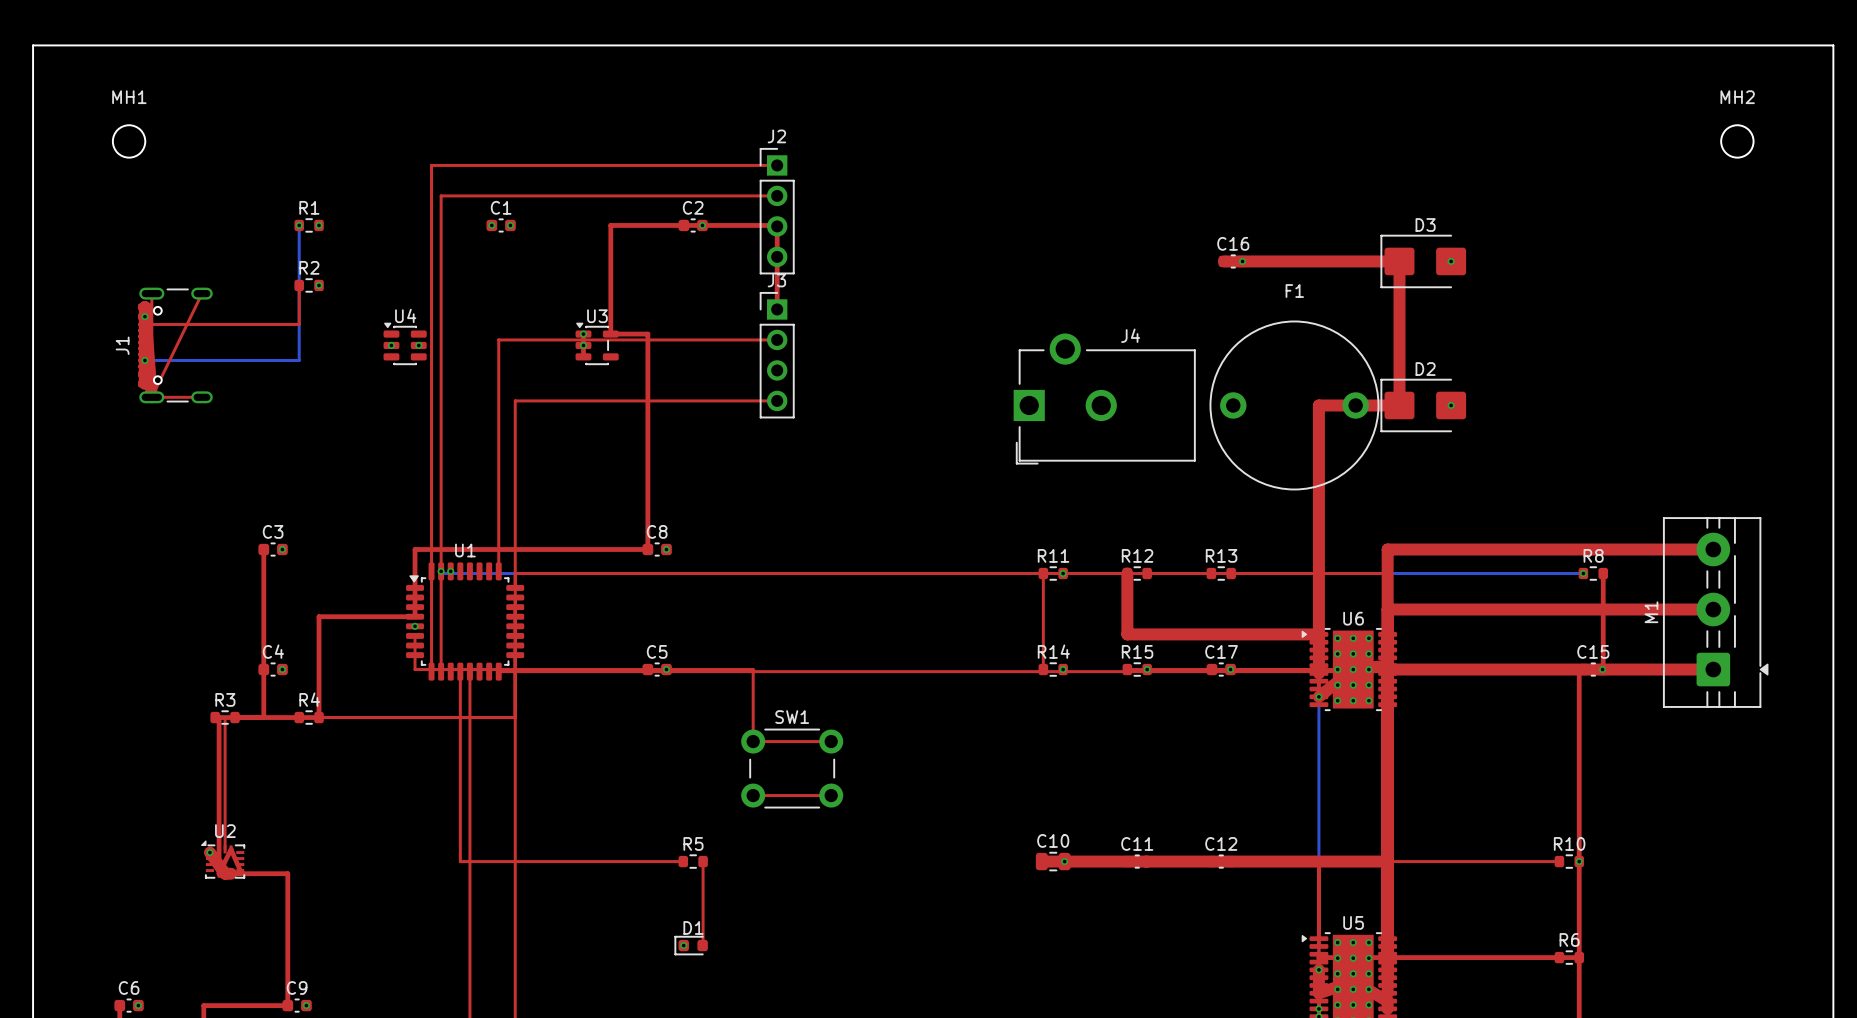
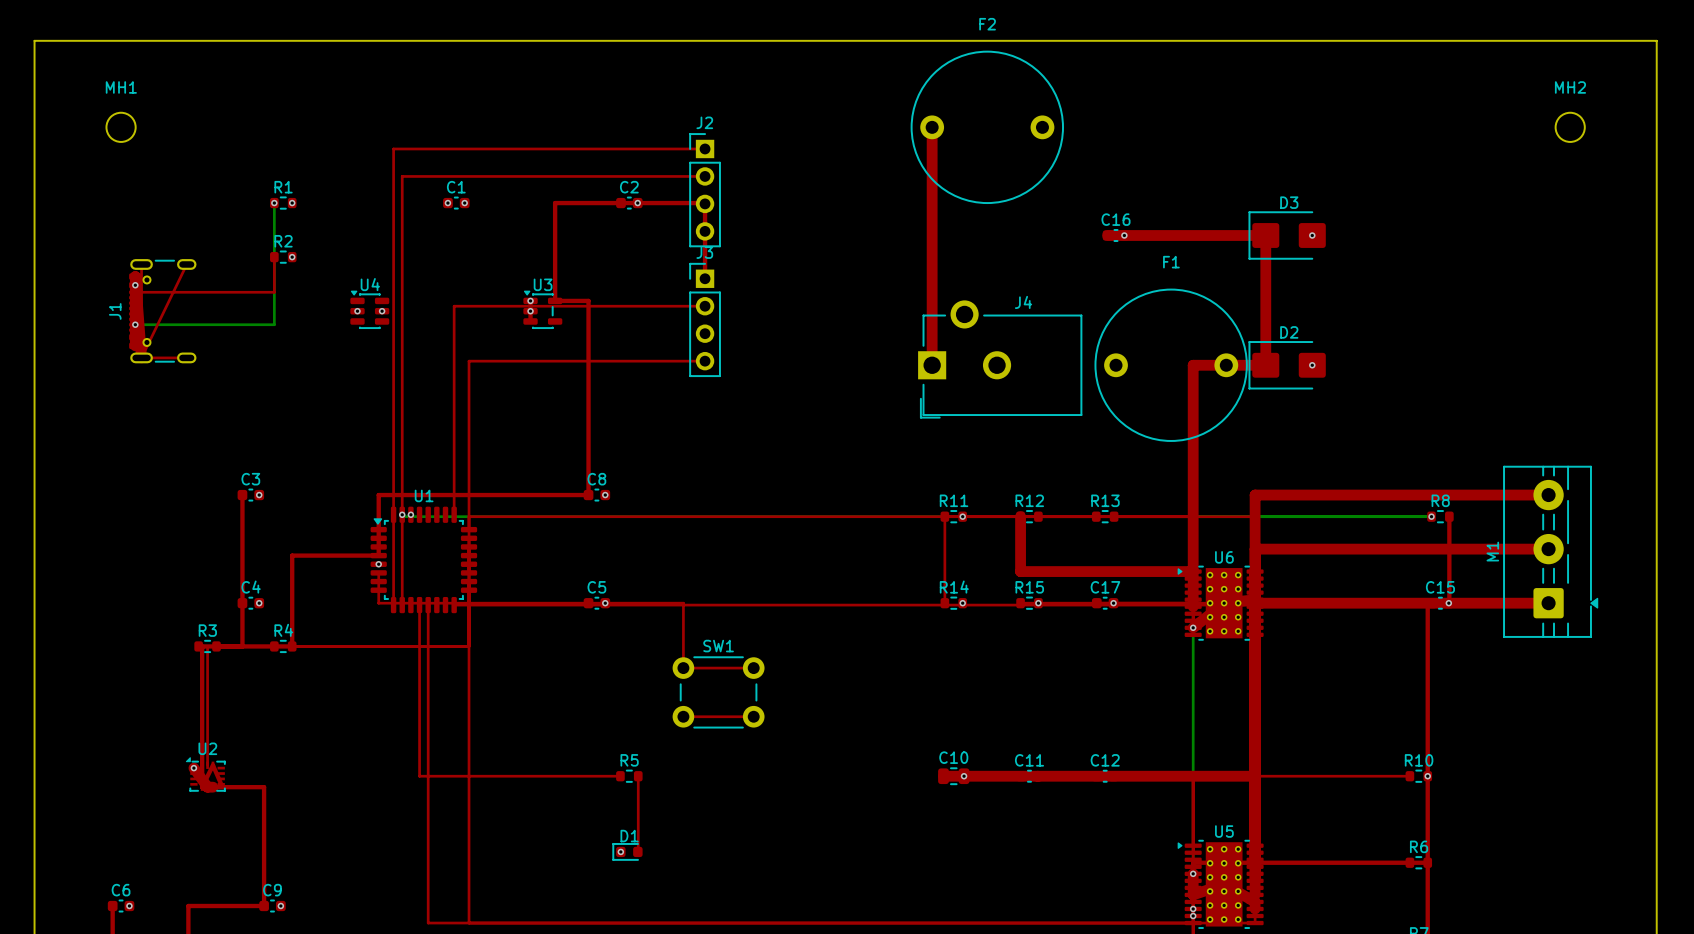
top track: none -> (932, 127) (932, 365)
F2: none -> (987, 127)

